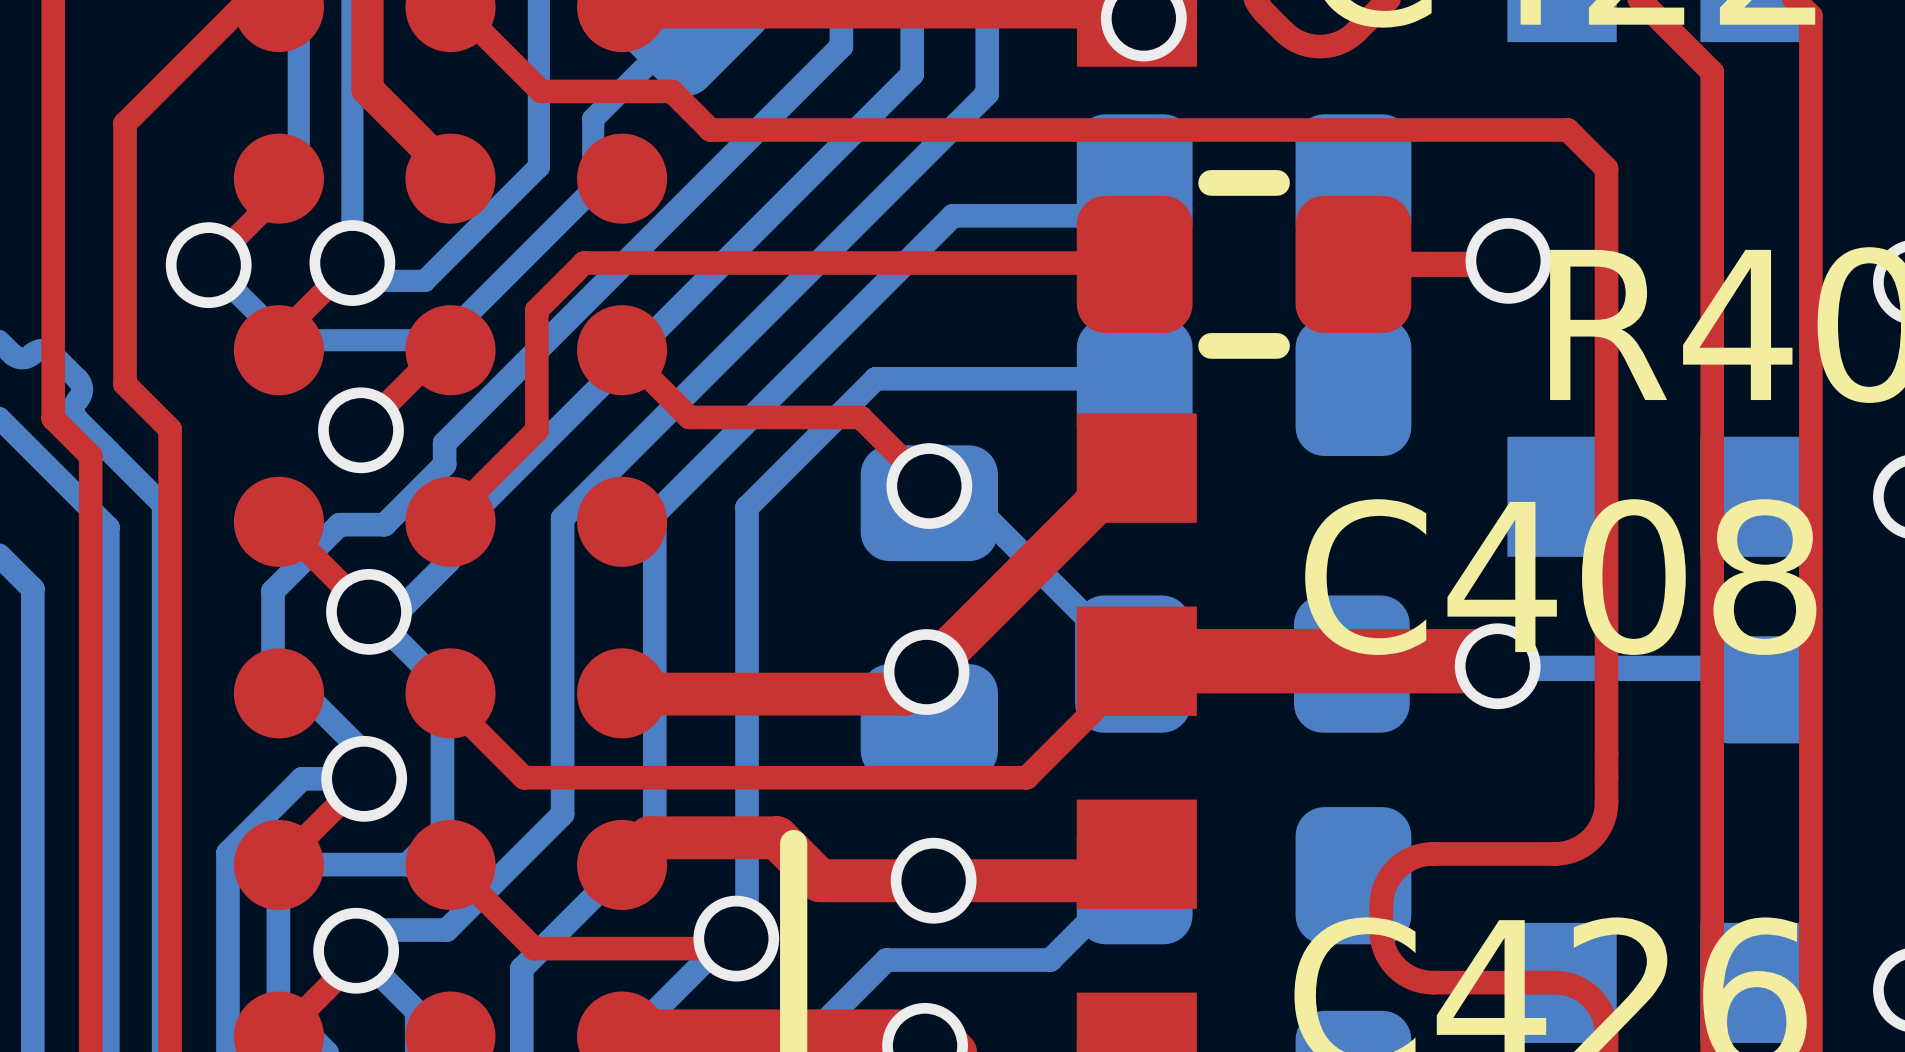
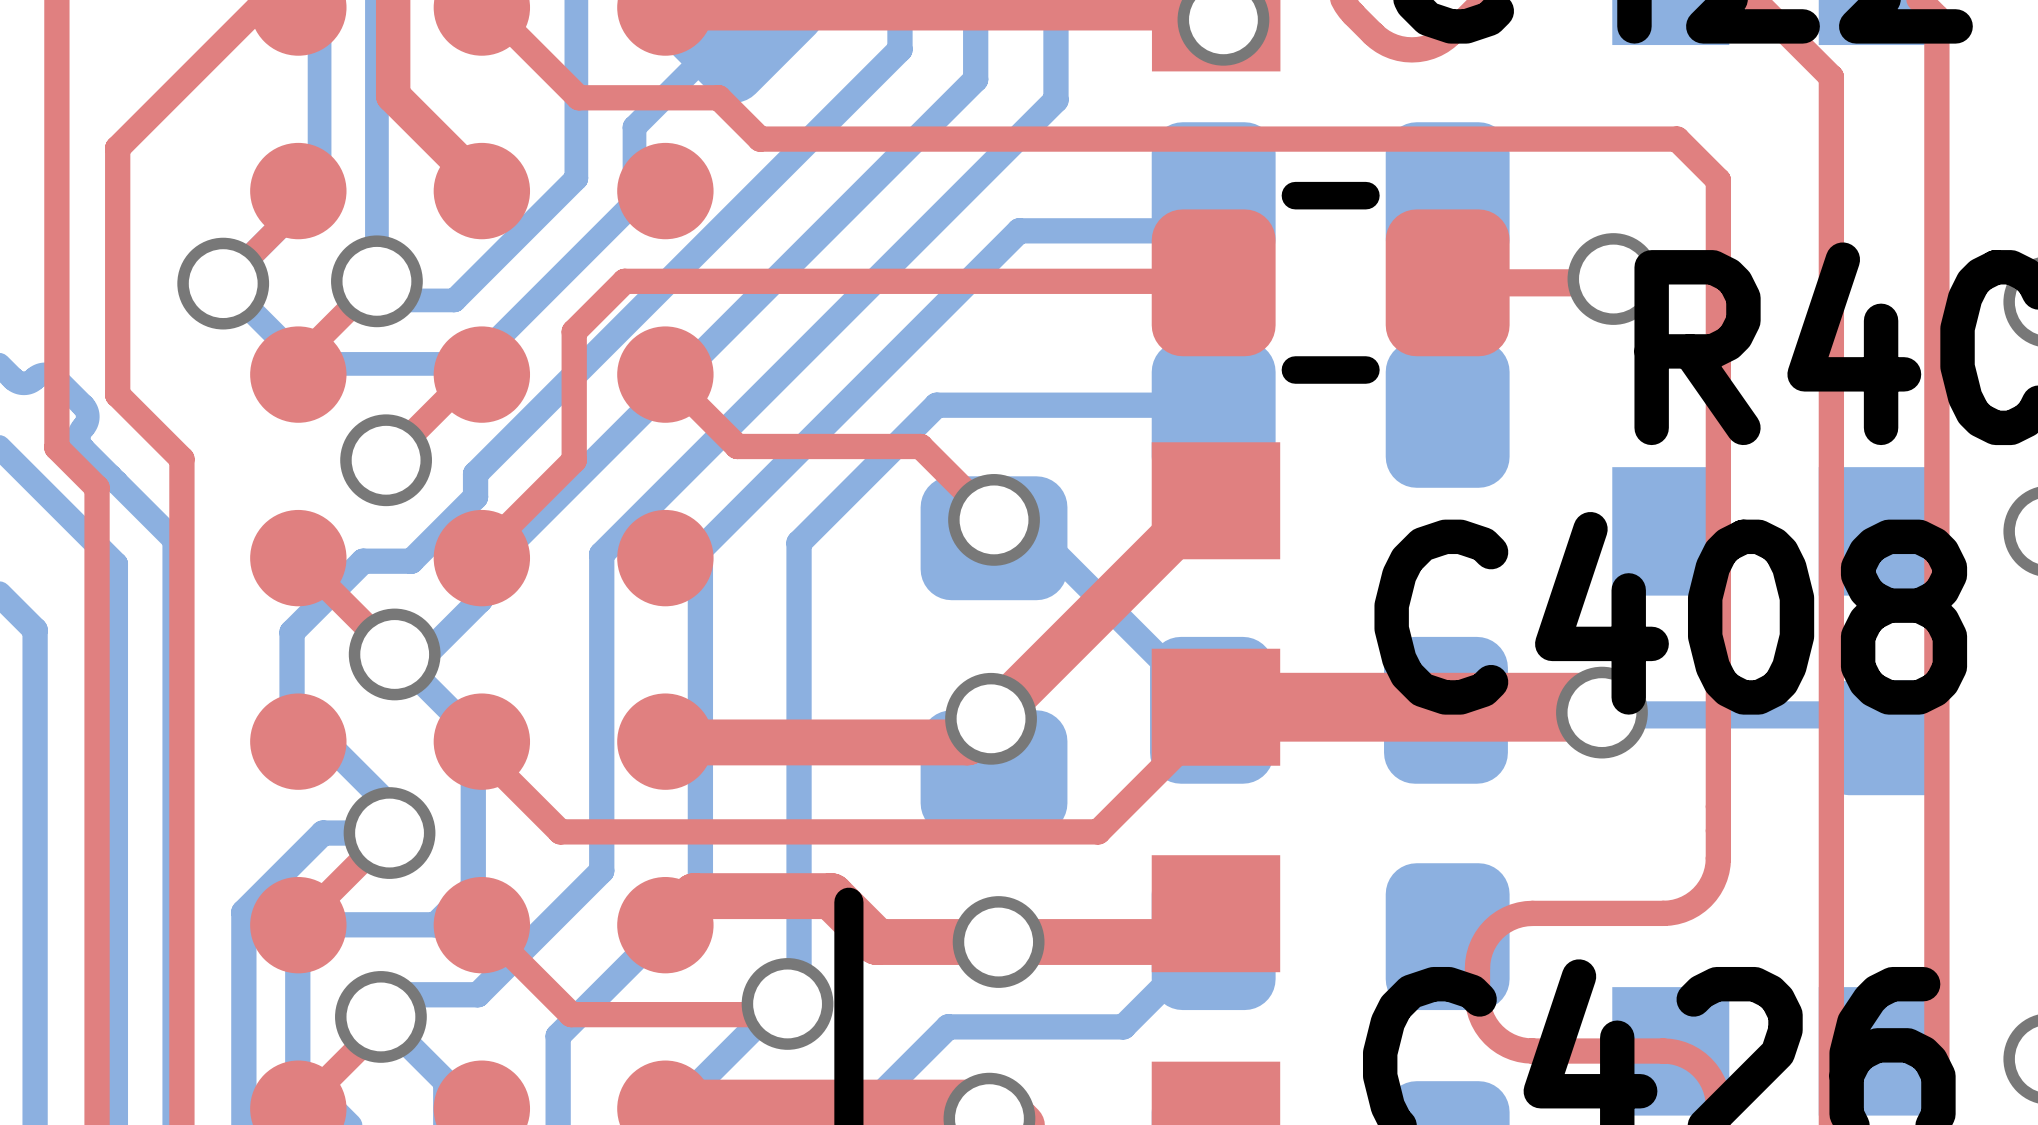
top track: (125, 123) (125, 384) -> (133, 132) (117, 148) (117, 394) (133, 410)

